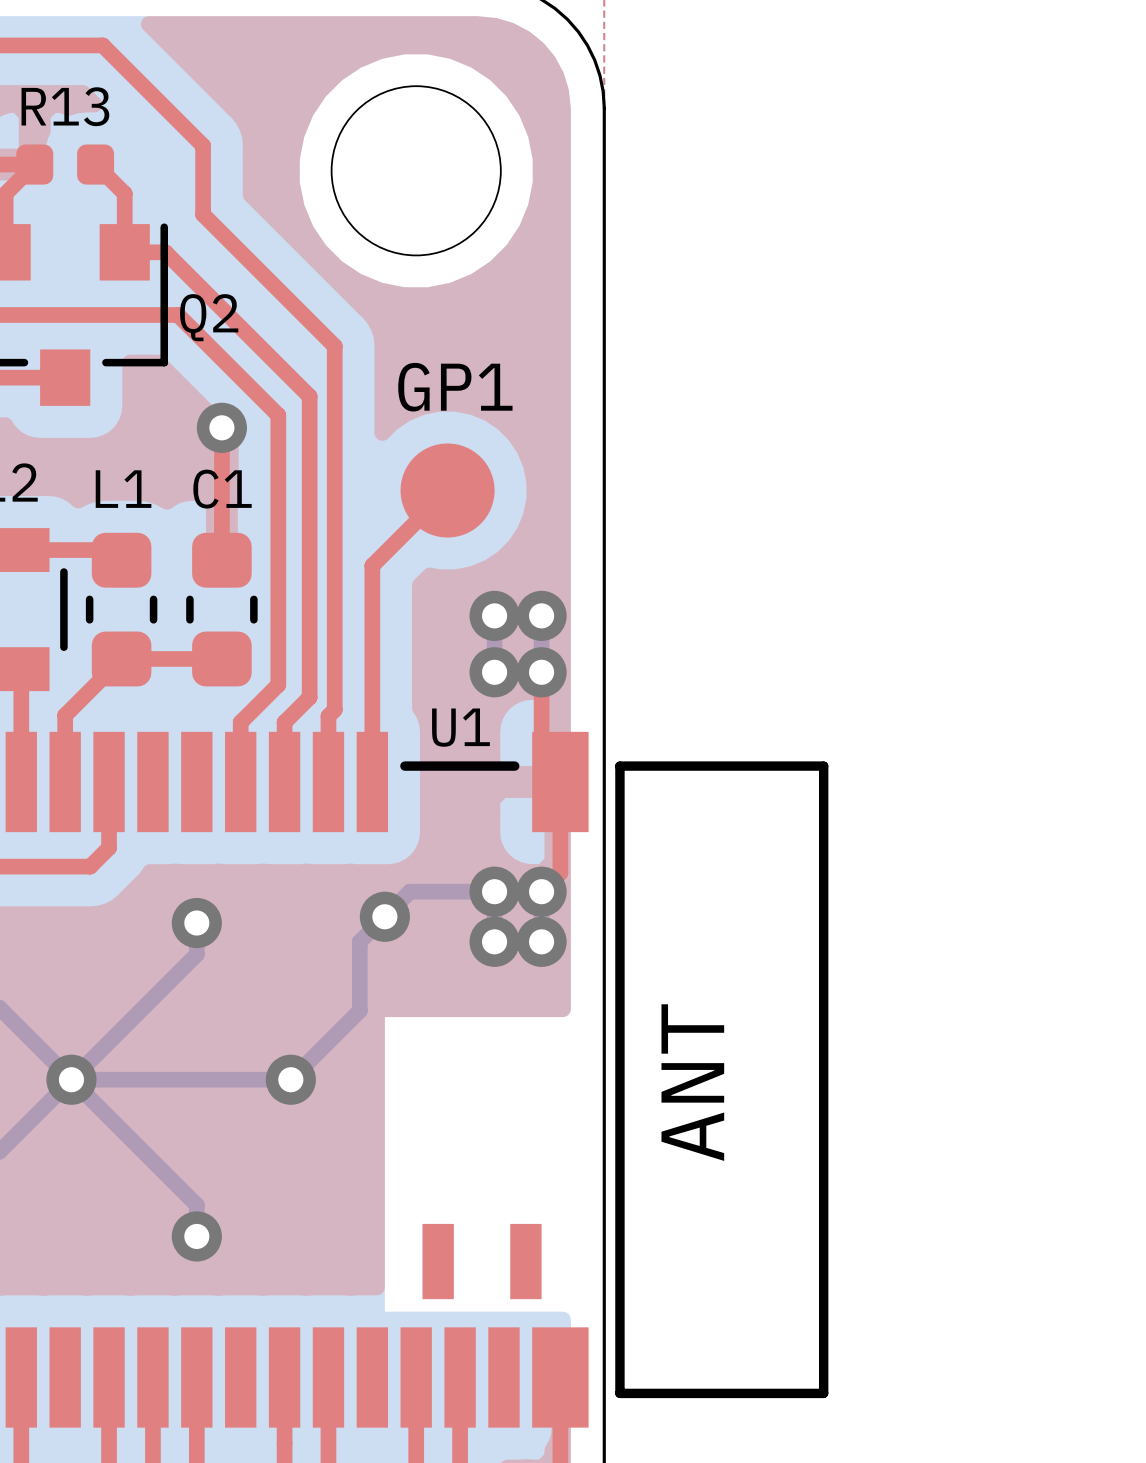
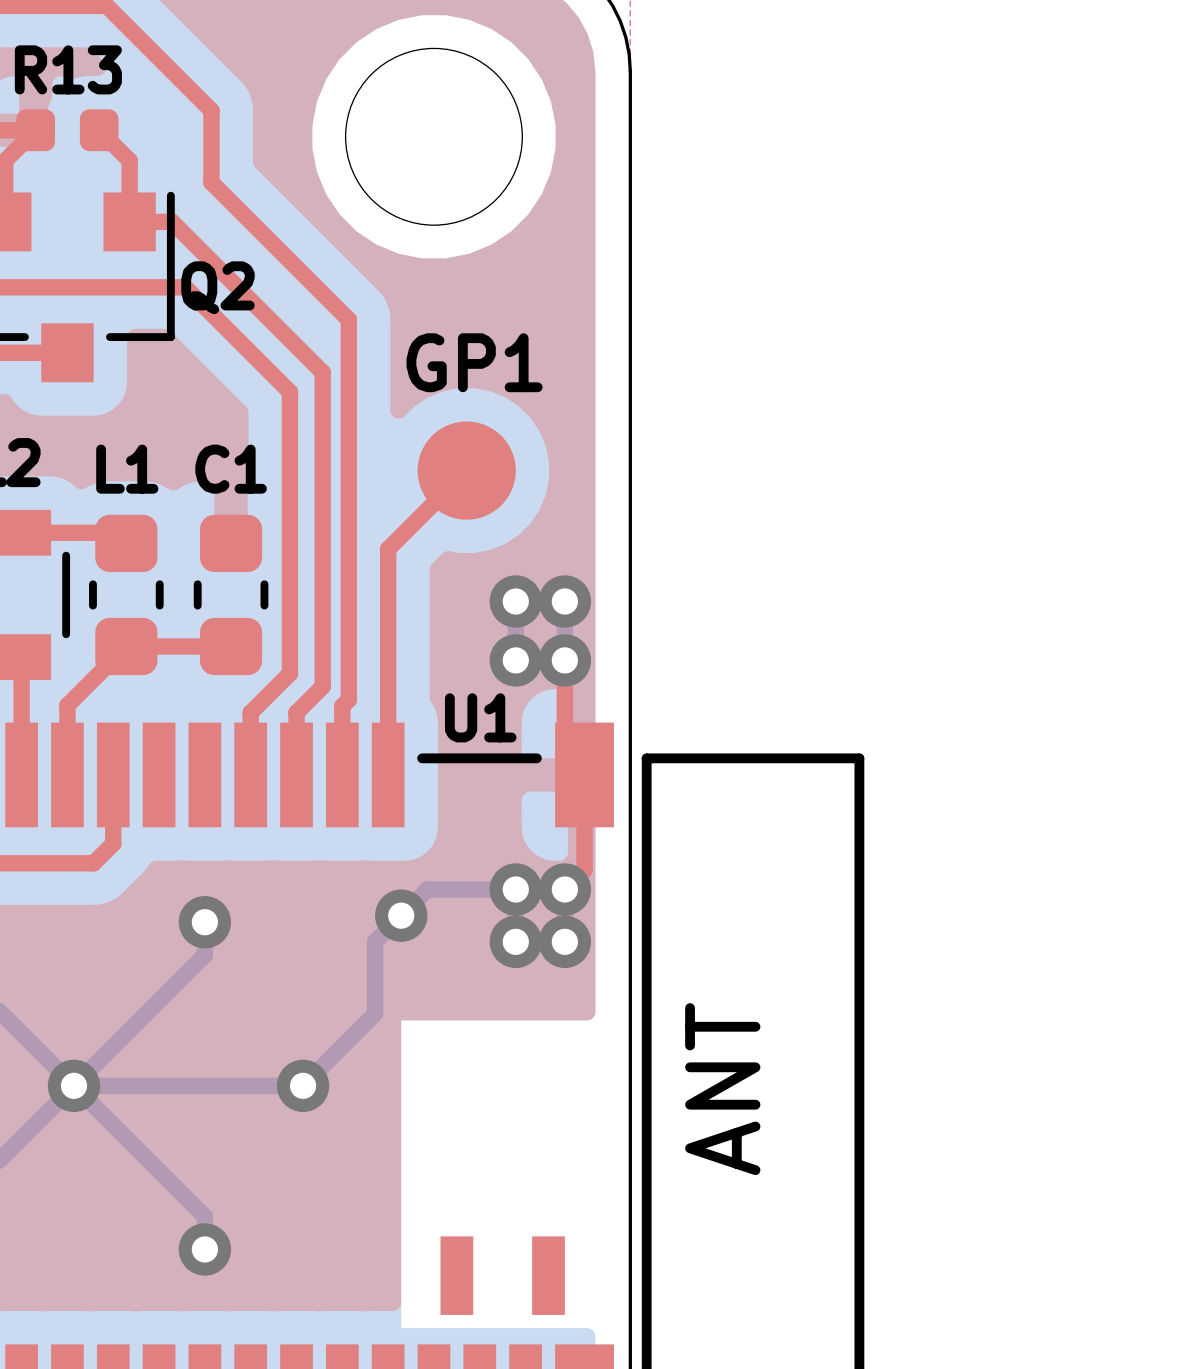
top track: (221, 427) (221, 560) -> none
via: (221, 427) -> none

